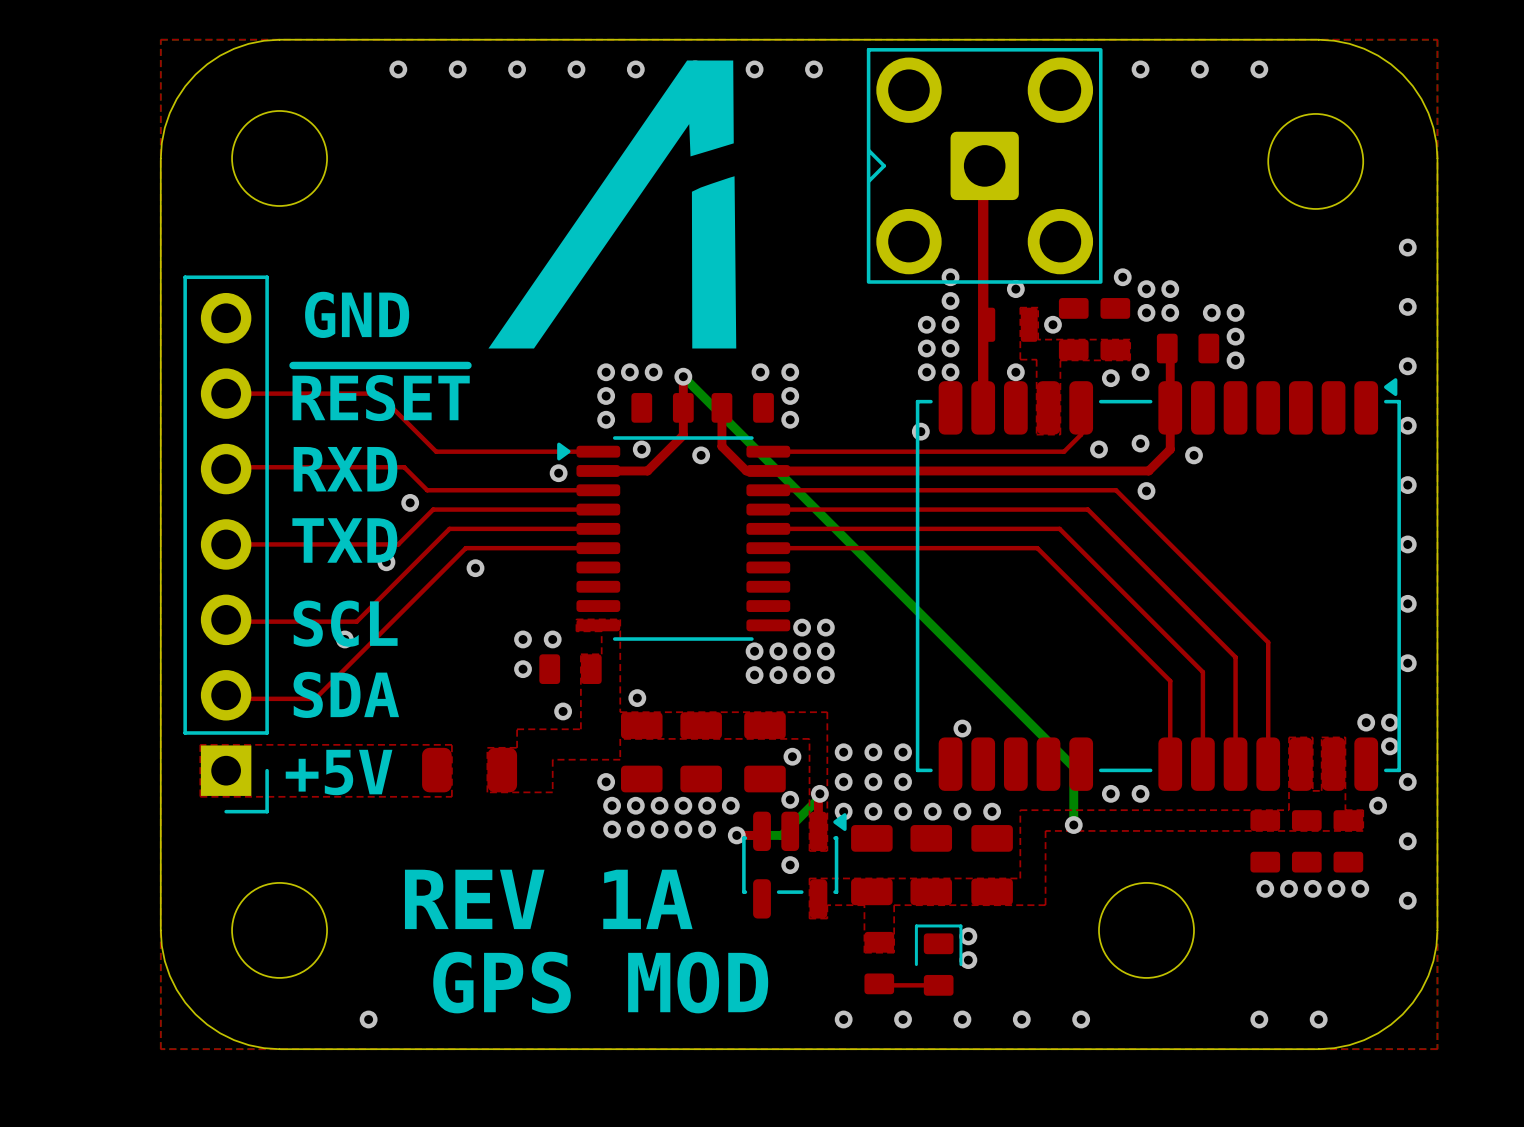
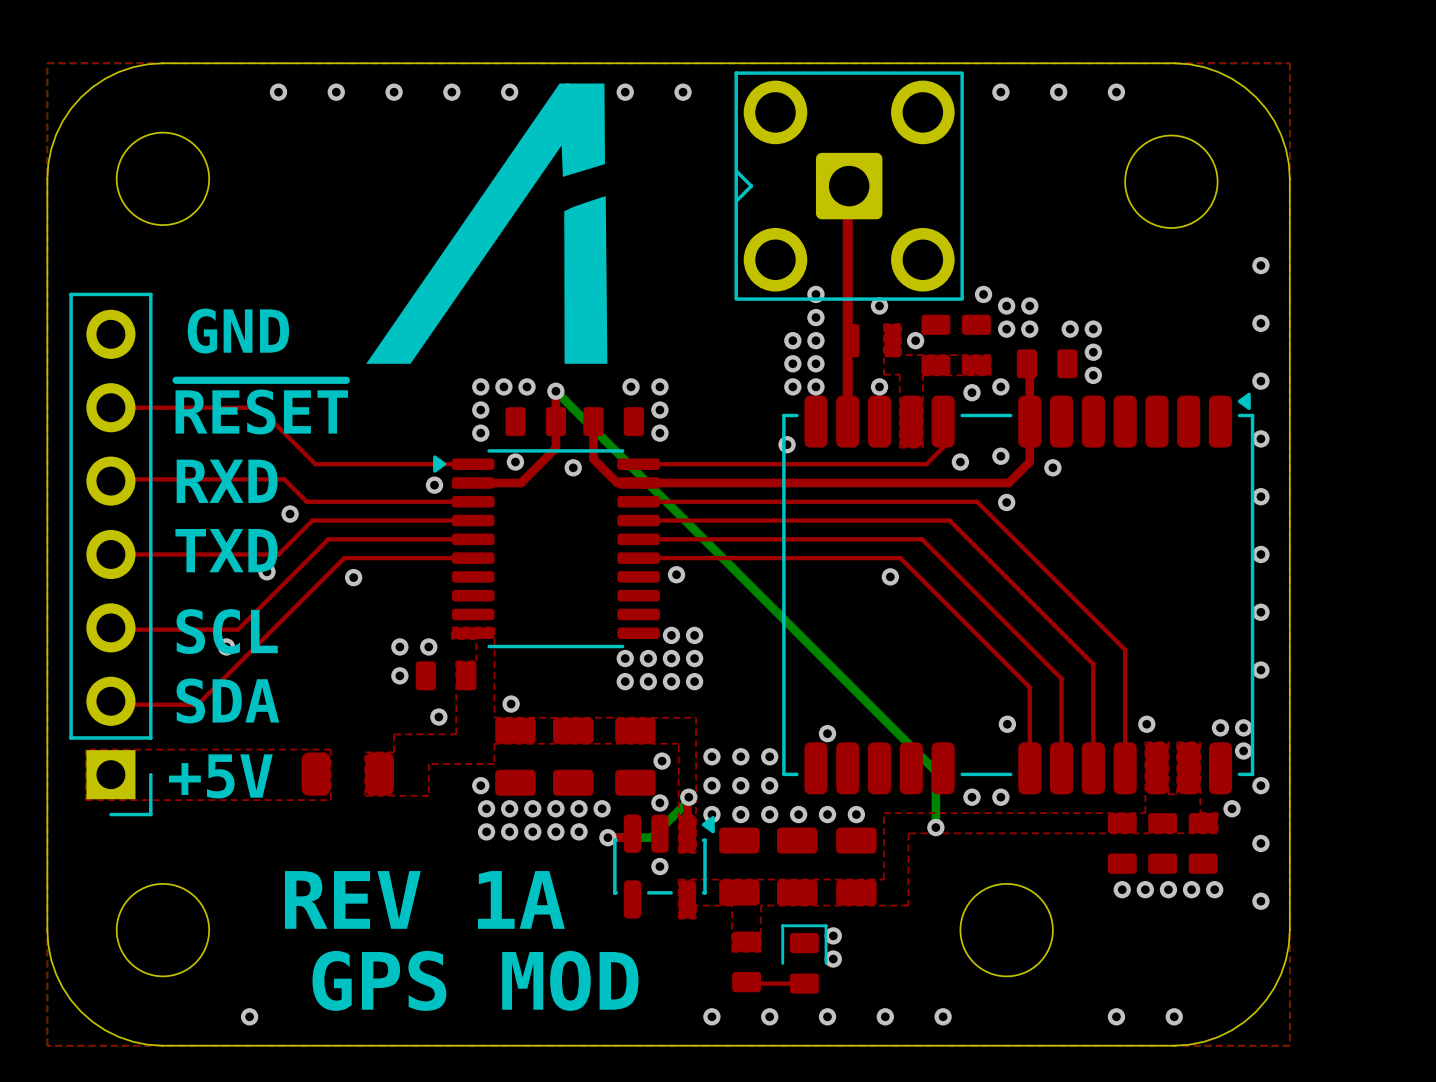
via: none -> (676, 574)
via: none -> (890, 576)
via: none -> (1007, 724)
via: none -> (1146, 724)

